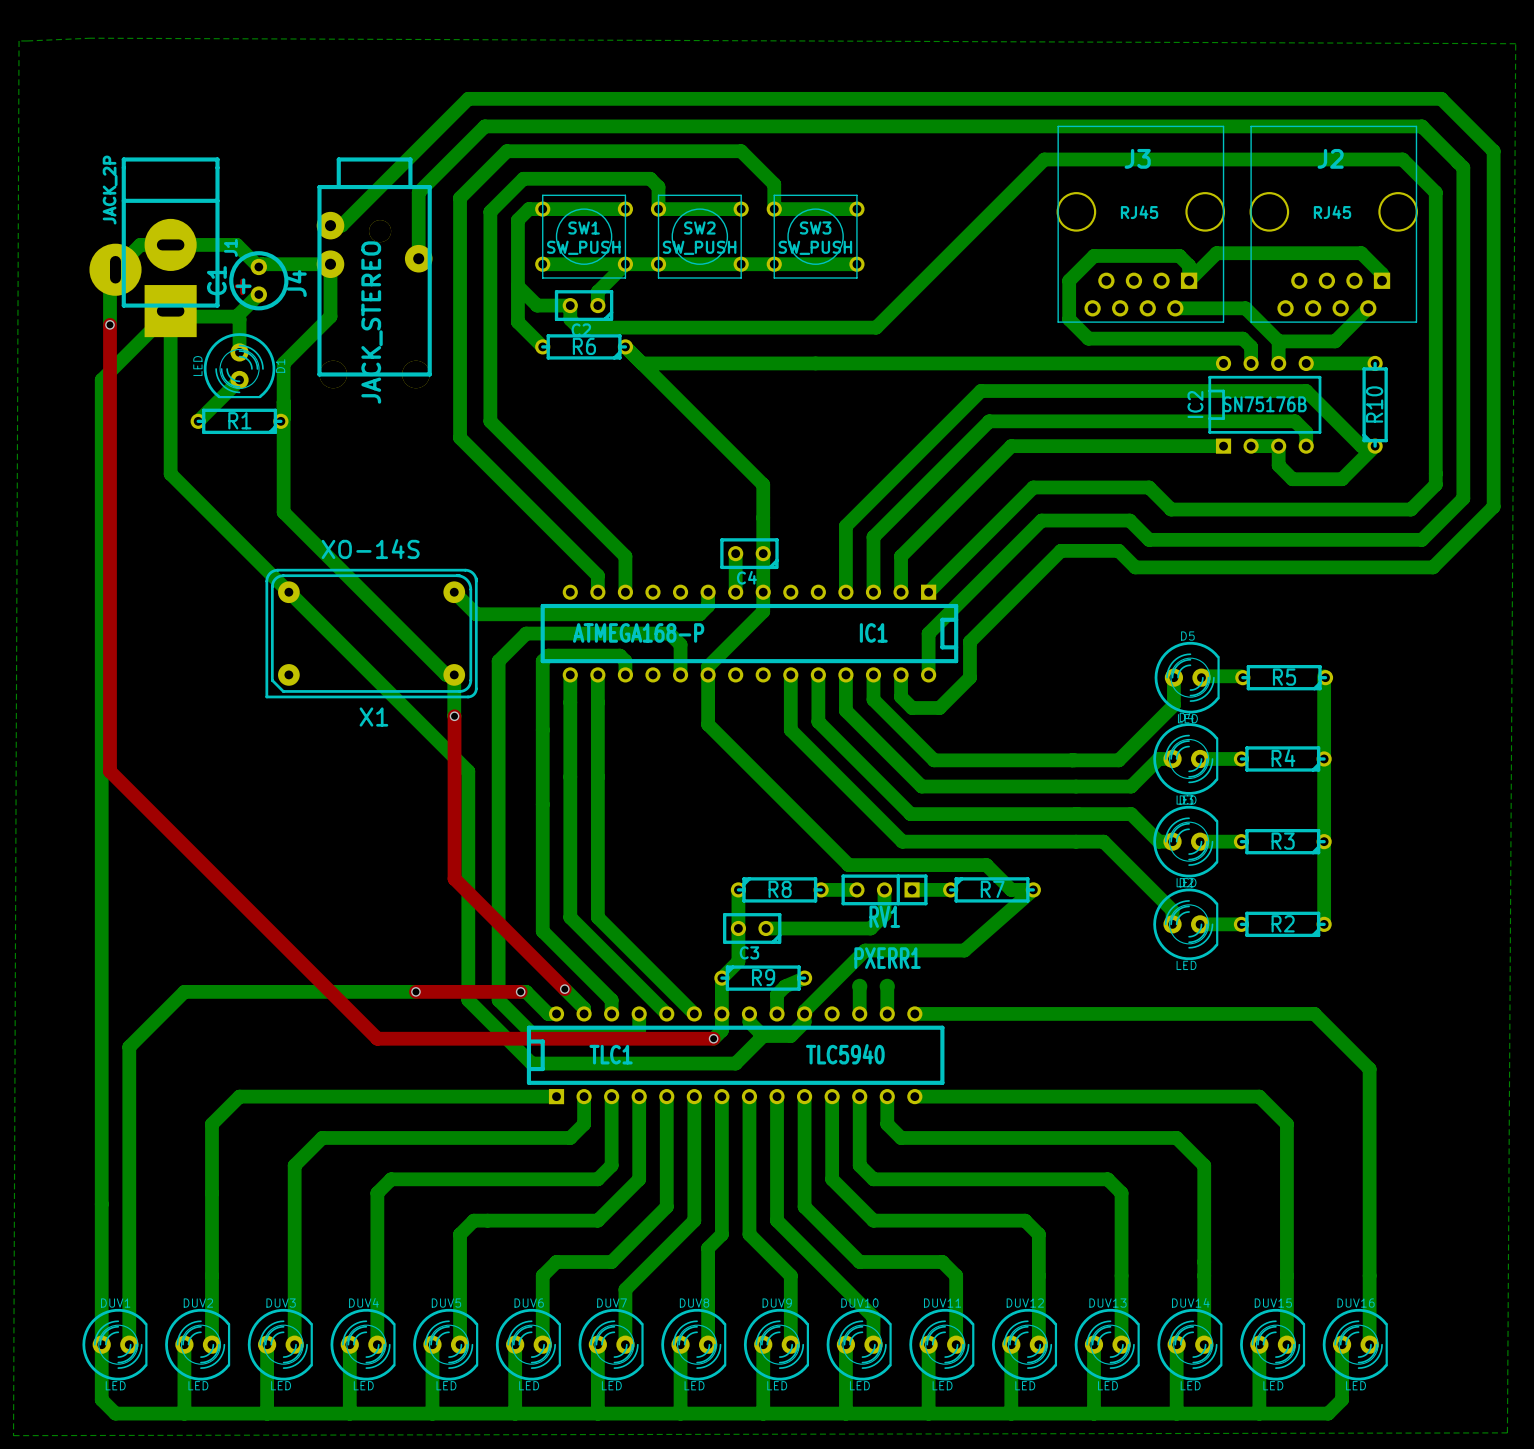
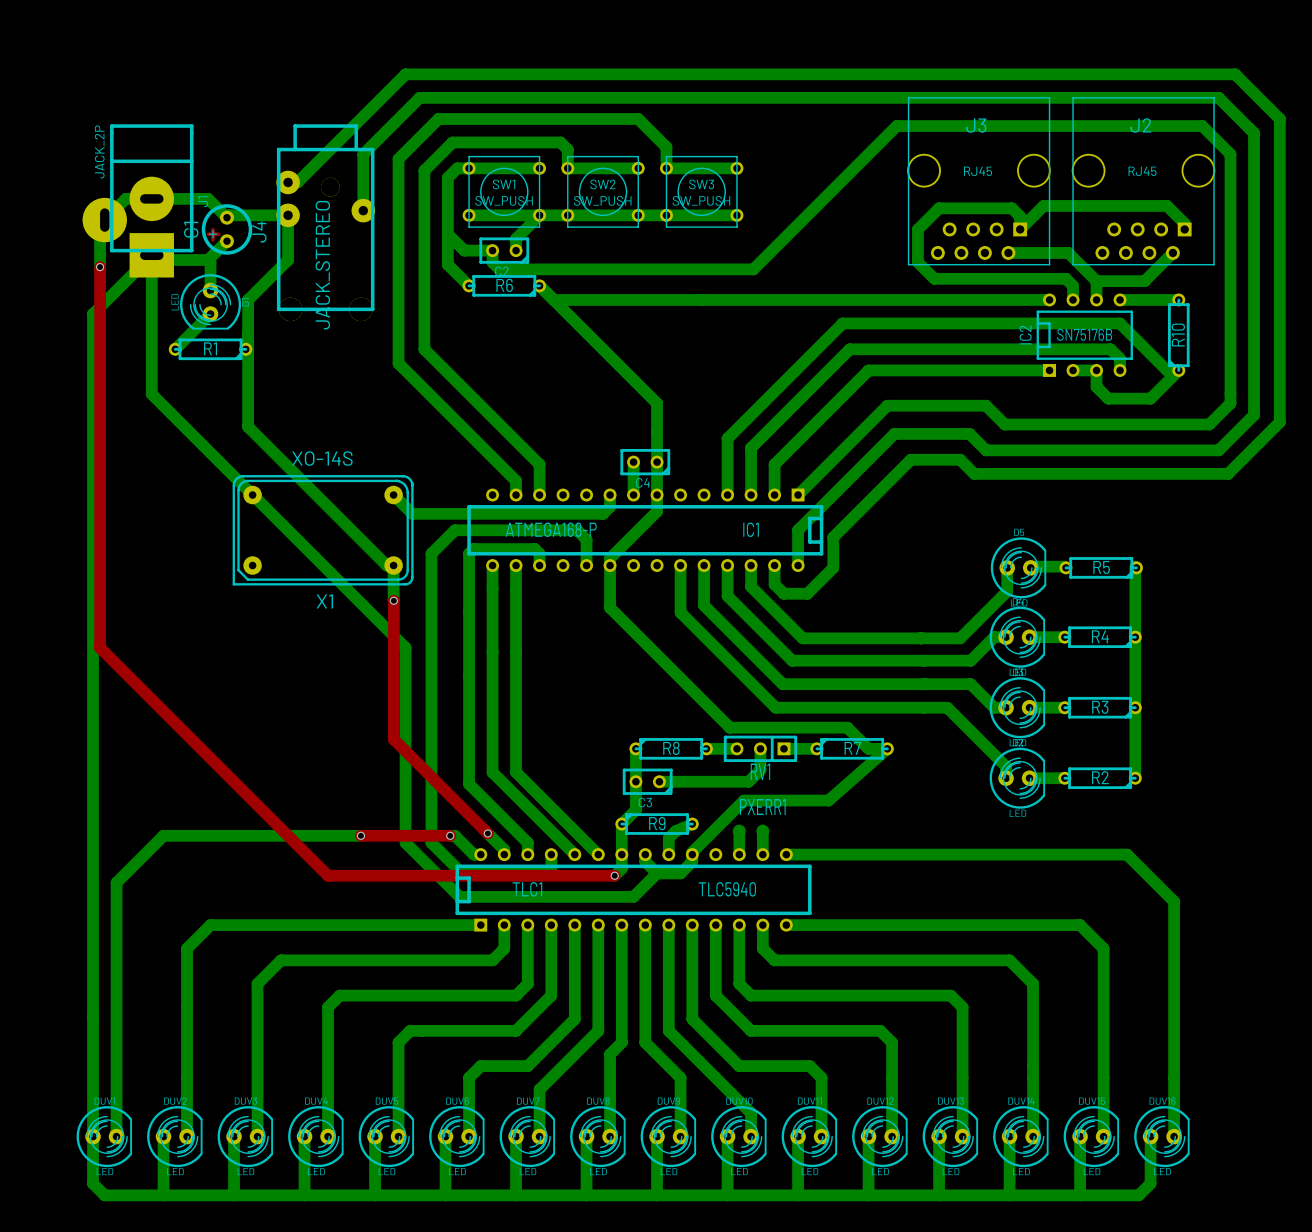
bottom zone outline: (90, 38) (1515, 43) (1507, 1432) (13, 1435) (19, 40) (90, 38) -> none

